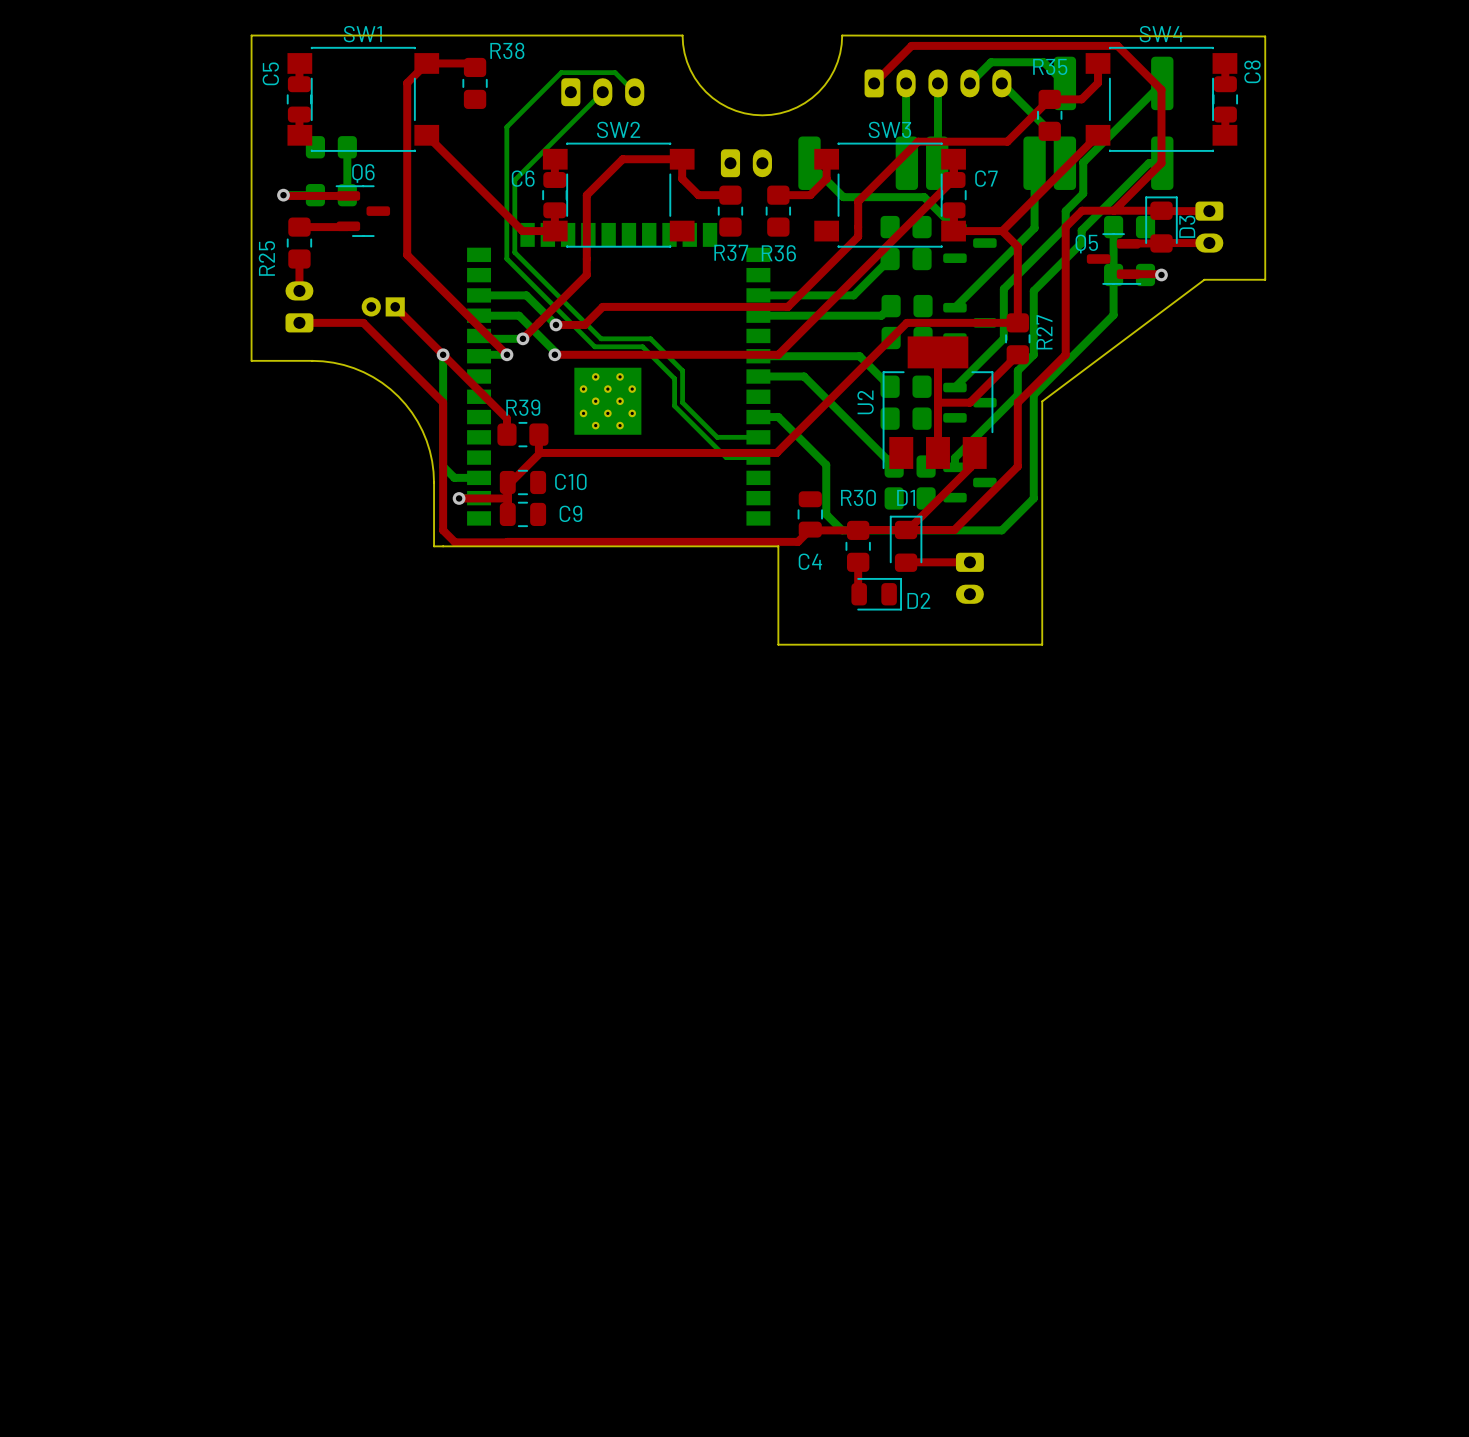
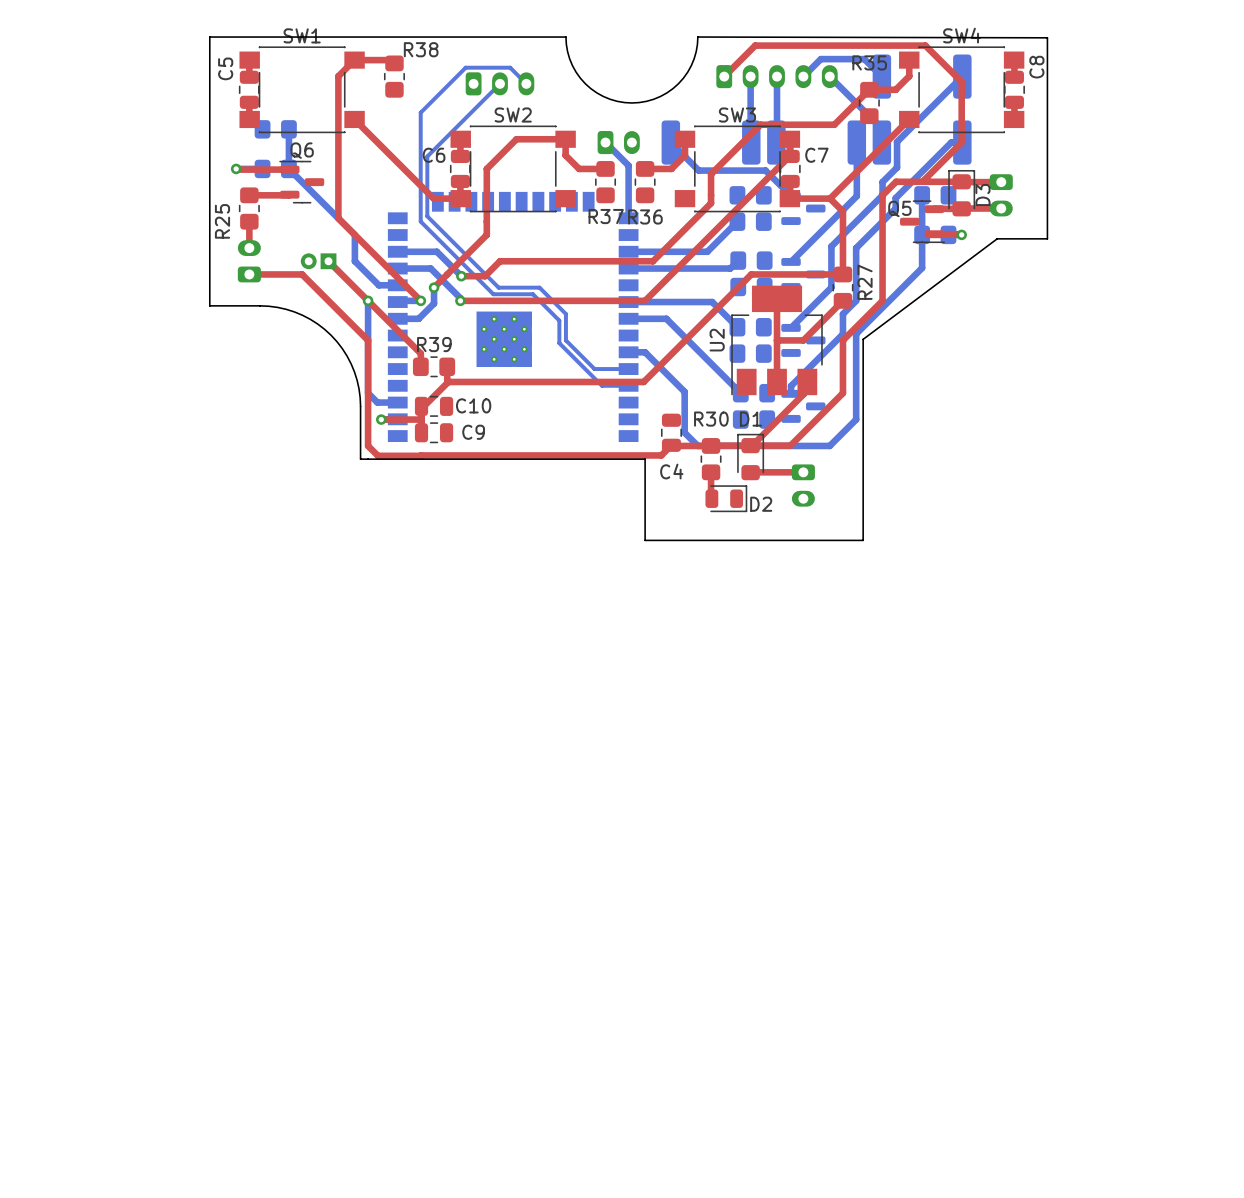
bottom track: none -> (605, 142) (628, 165) (628, 218)
bottom track: none -> (288, 168) (354, 234) (354, 261) (378, 285) (397, 285)
bottom track: (481, 338) (522, 338) -> (397, 318) (418, 318) (434, 303) (434, 287)

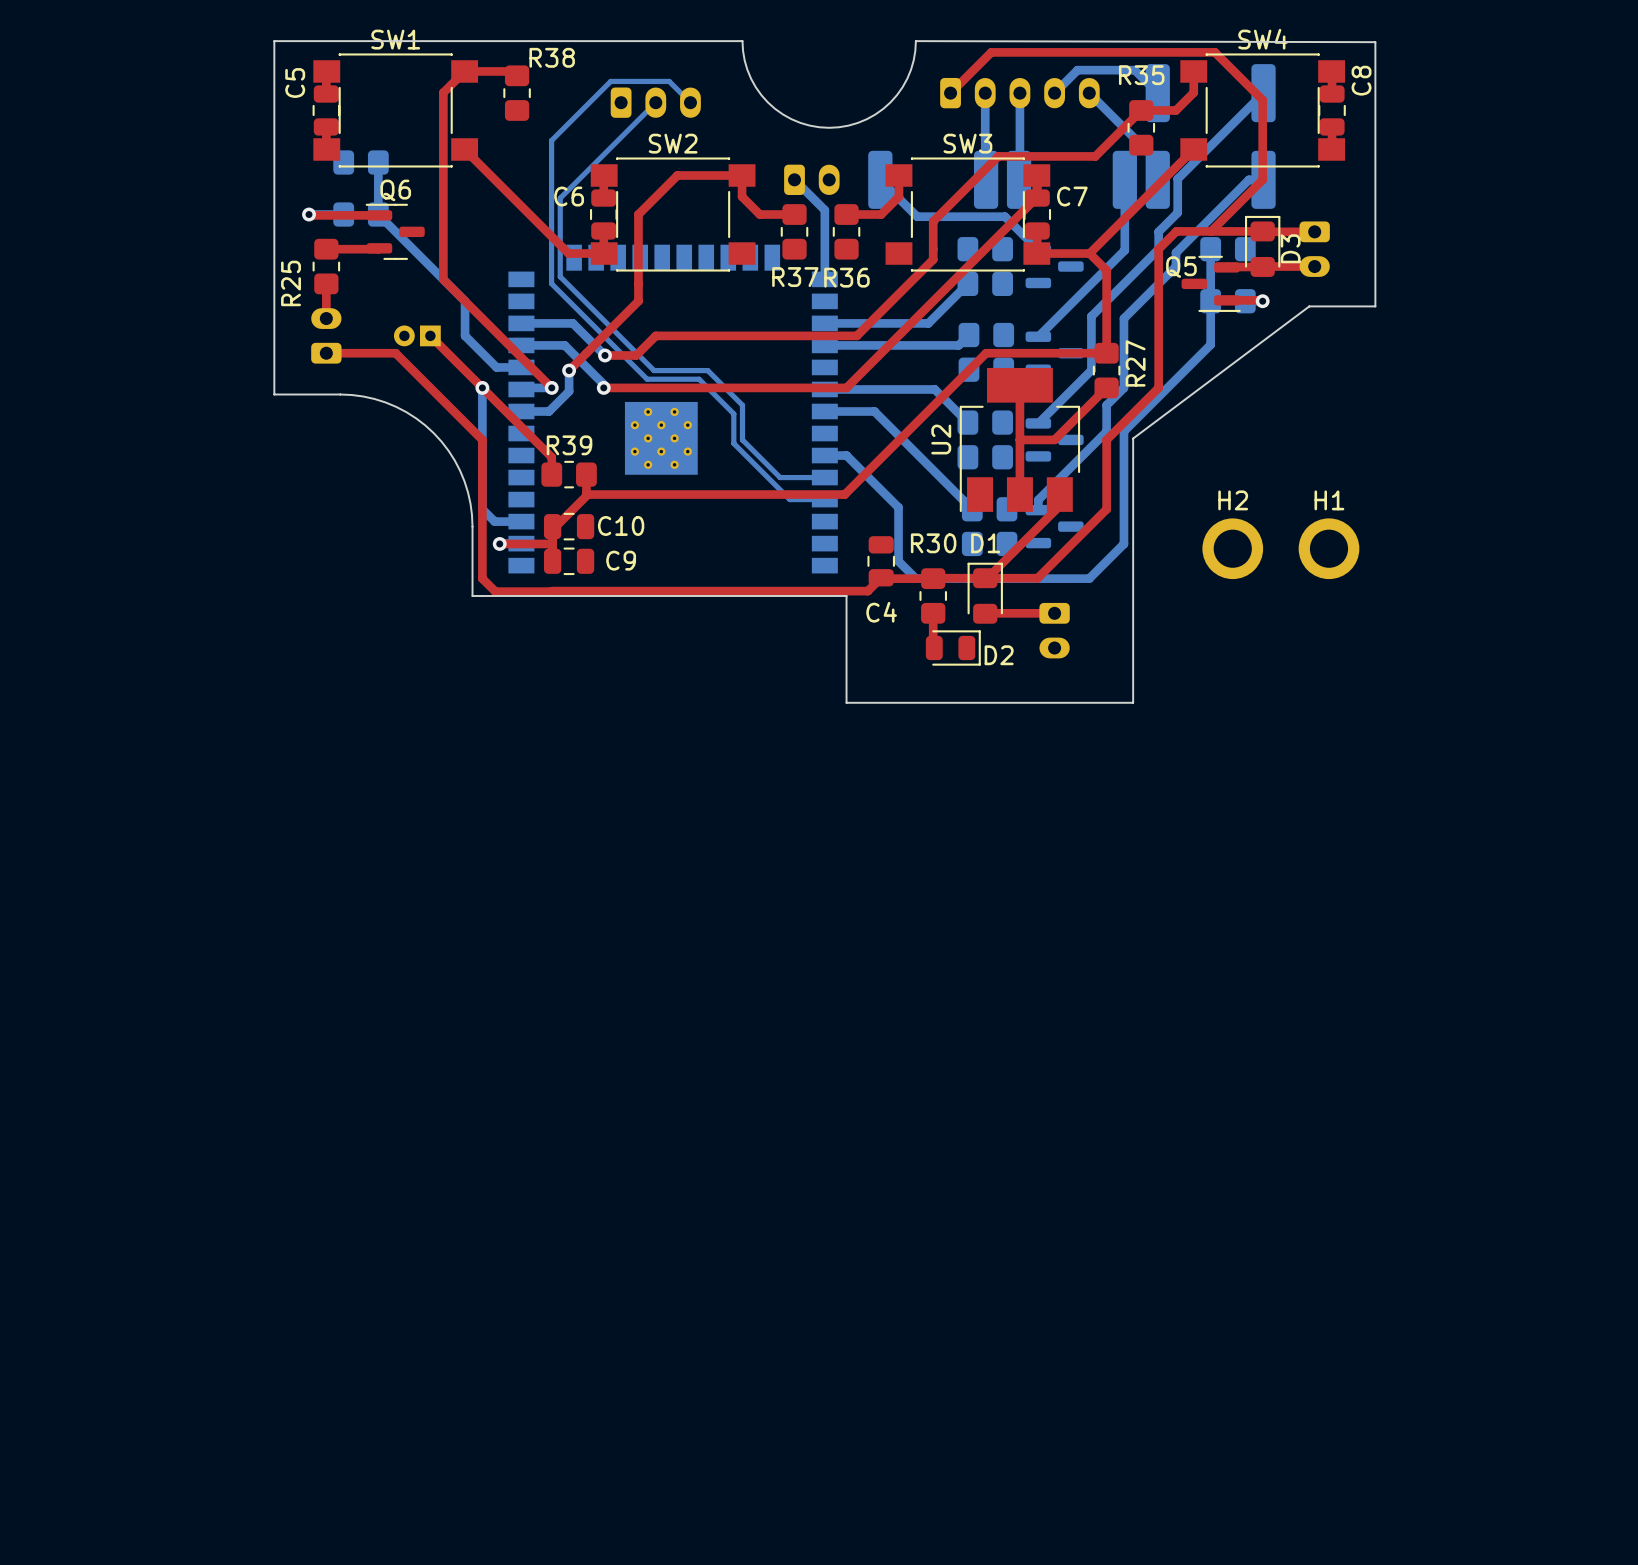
H2: none -> (1232, 548)
H1: none -> (1329, 548)

